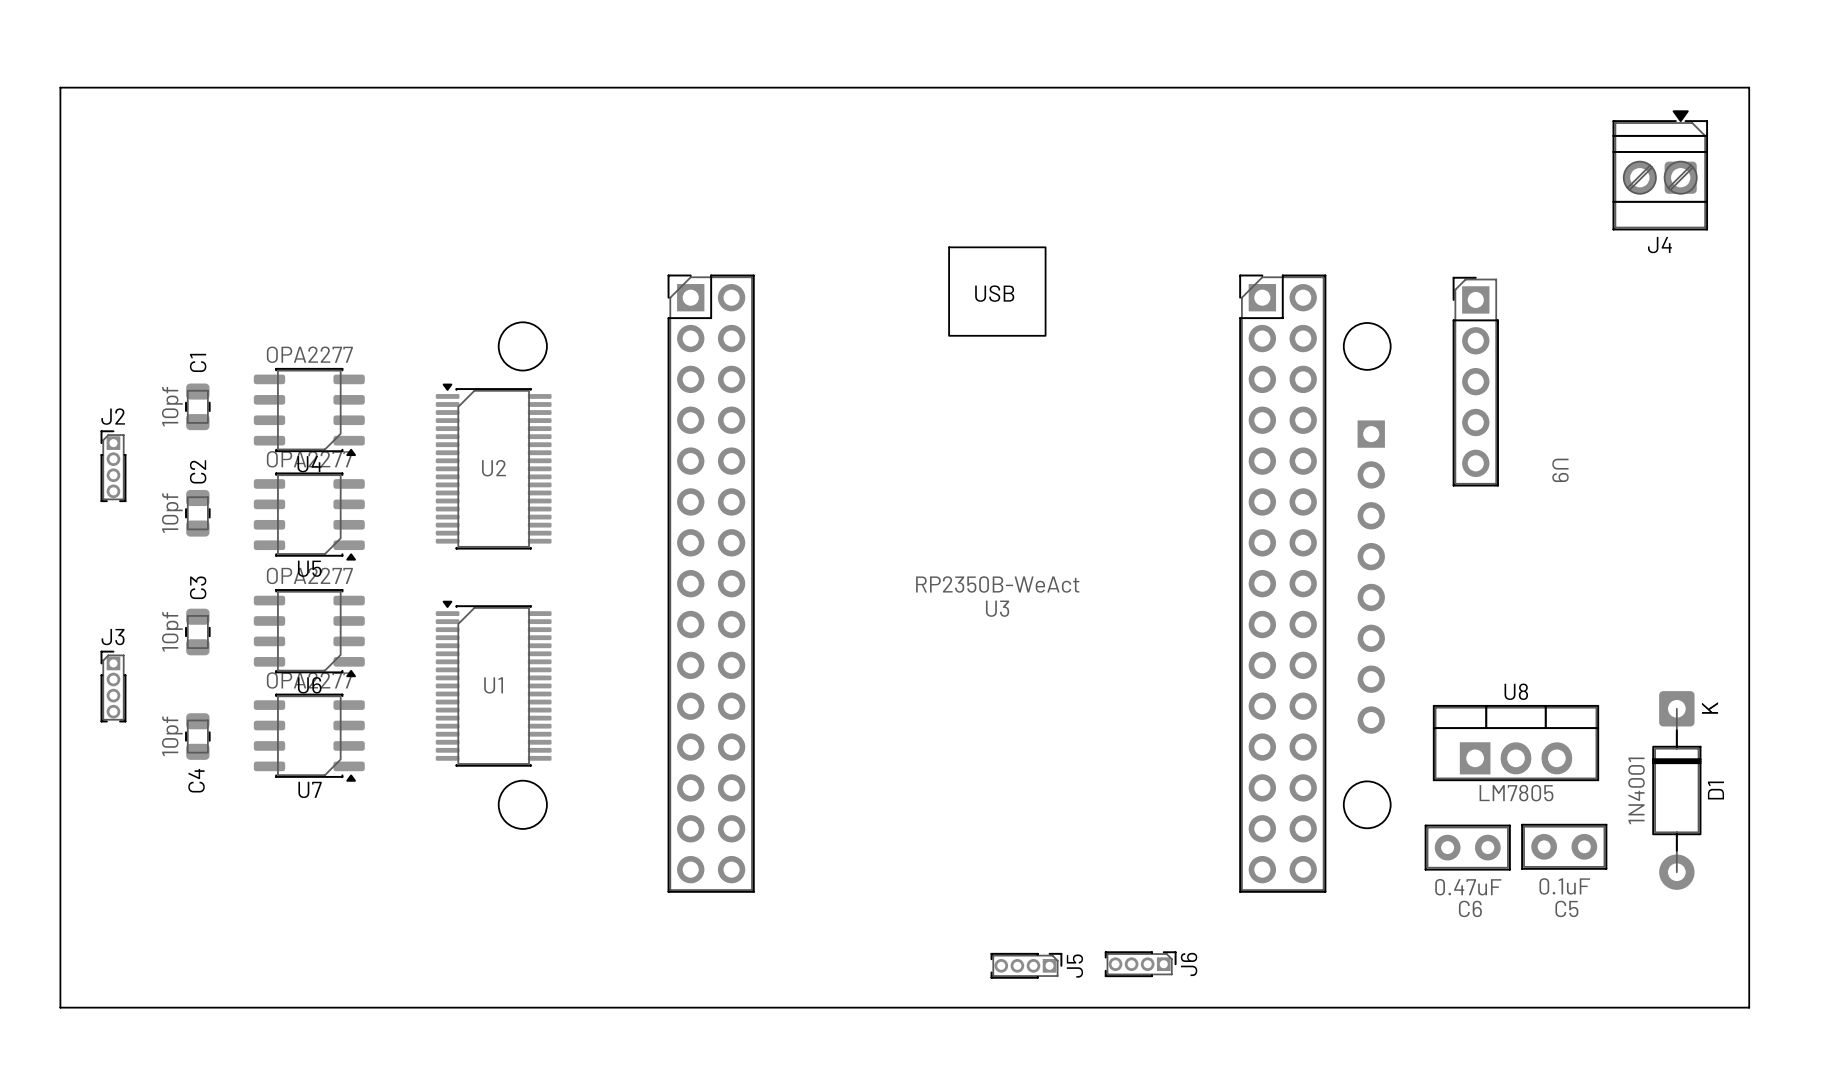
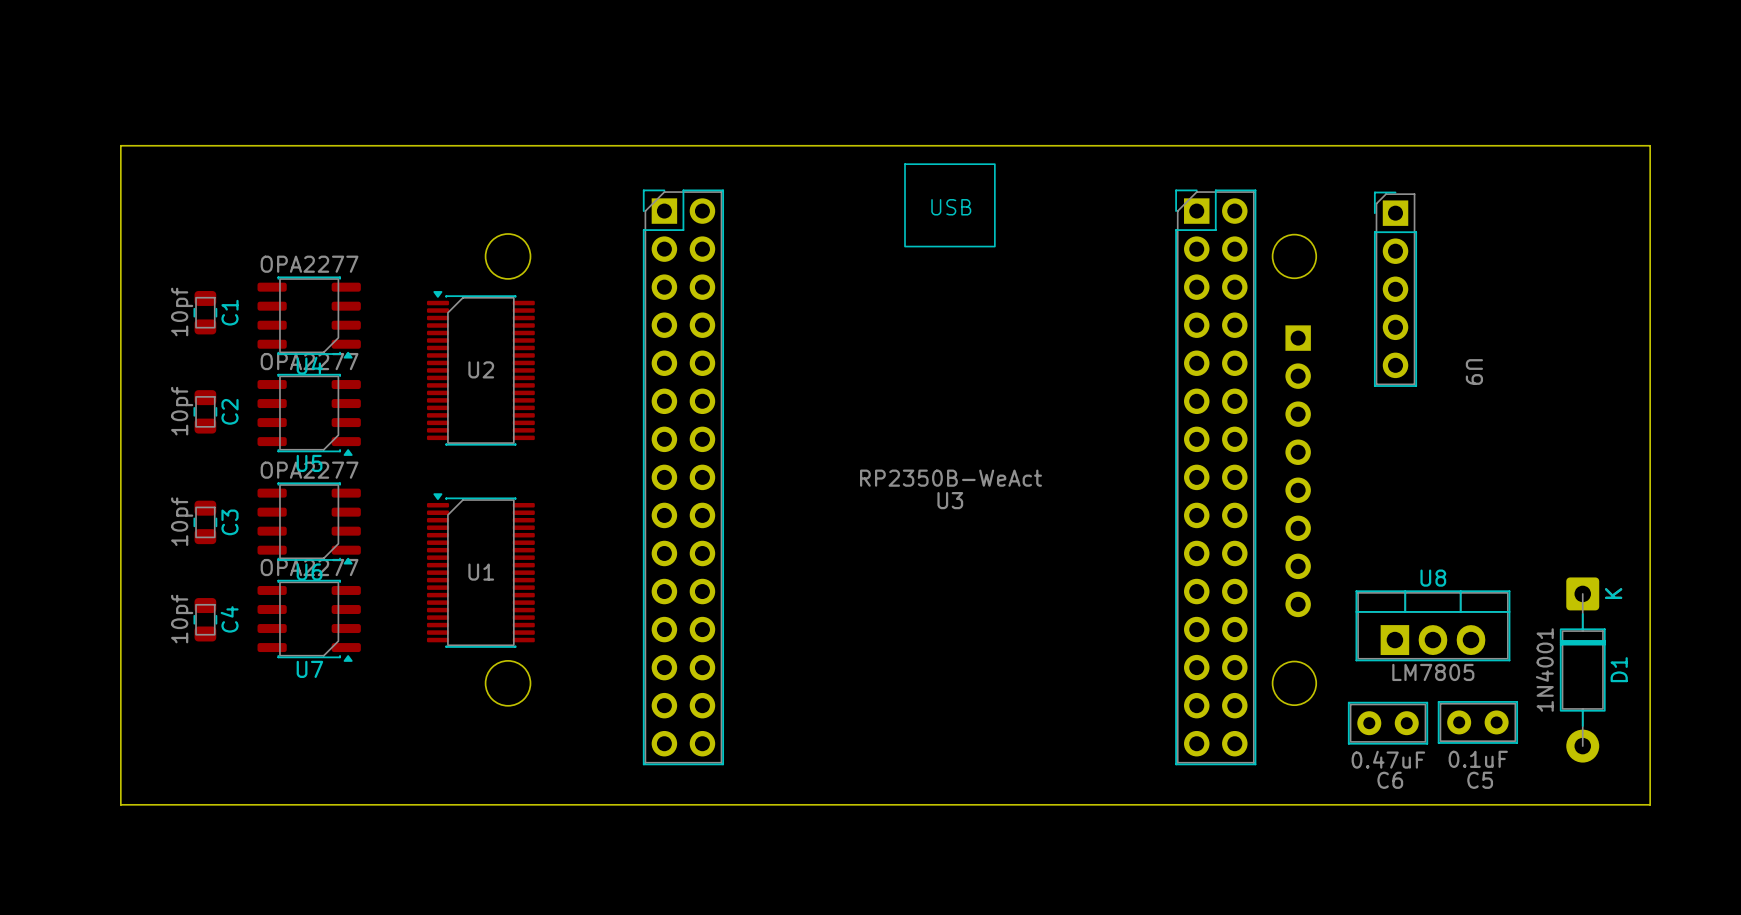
J4: (1660, 170) -> none
board edge: (1749, 227) (1749, 87) (60, 87) (60, 1007) (1749, 1007) (1749, 935) -> (1650, 145) (120, 145) (120, 804) (1650, 804)
C1 name position: C1 (198, 362) -> C1 (229, 312)
J2: (113, 466) -> none
C2 name position: C2 (198, 471) -> C2 (229, 411)
C3 name position: C3 (198, 587) -> C3 (229, 522)
J3: (113, 686) -> none
C4 name position: C4 (196, 780) -> C4 (229, 619)
J6: (1140, 964) -> none
J5: (1026, 965) -> none

